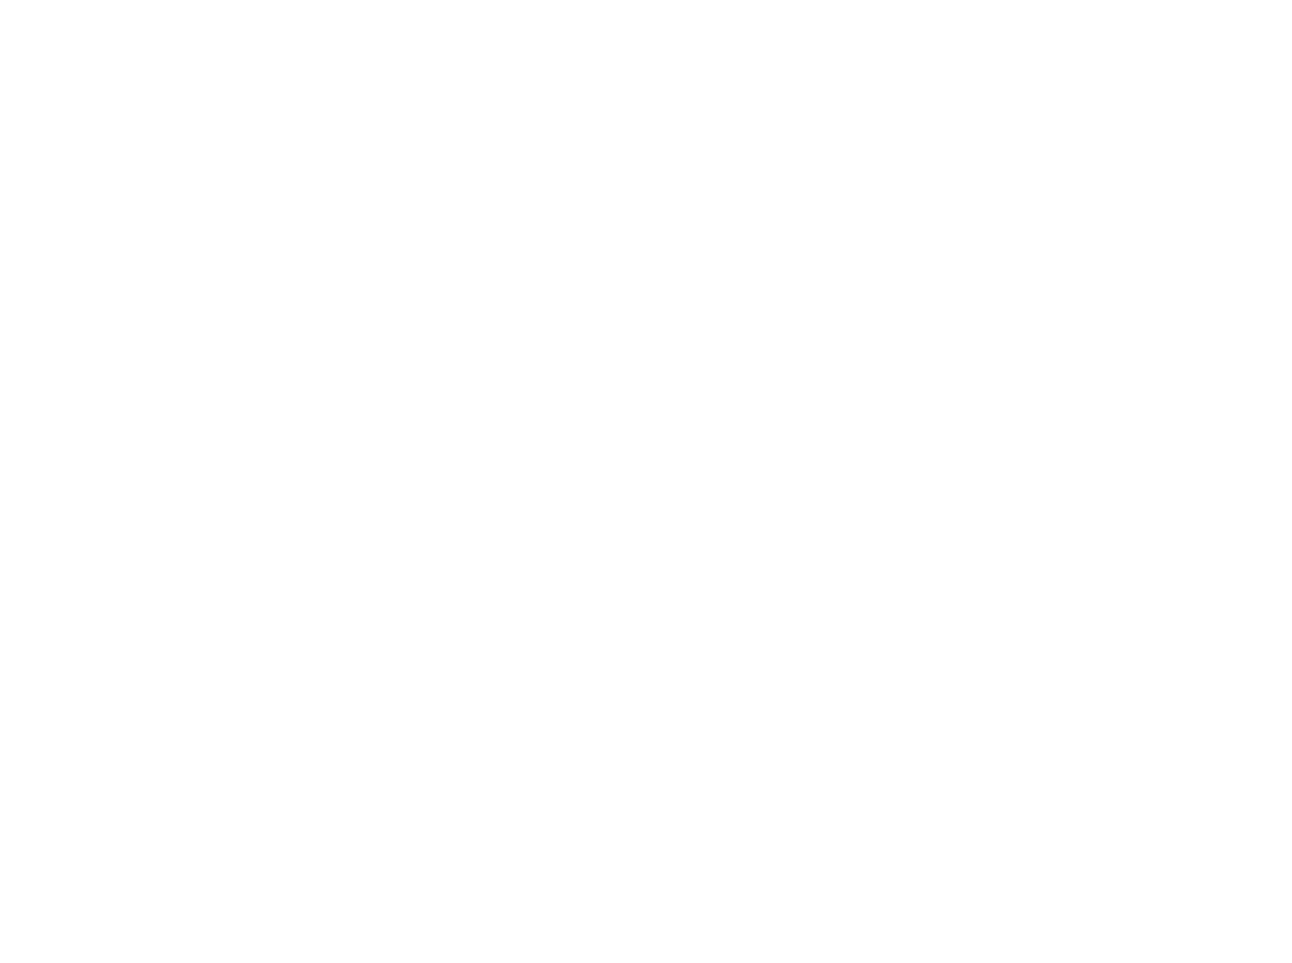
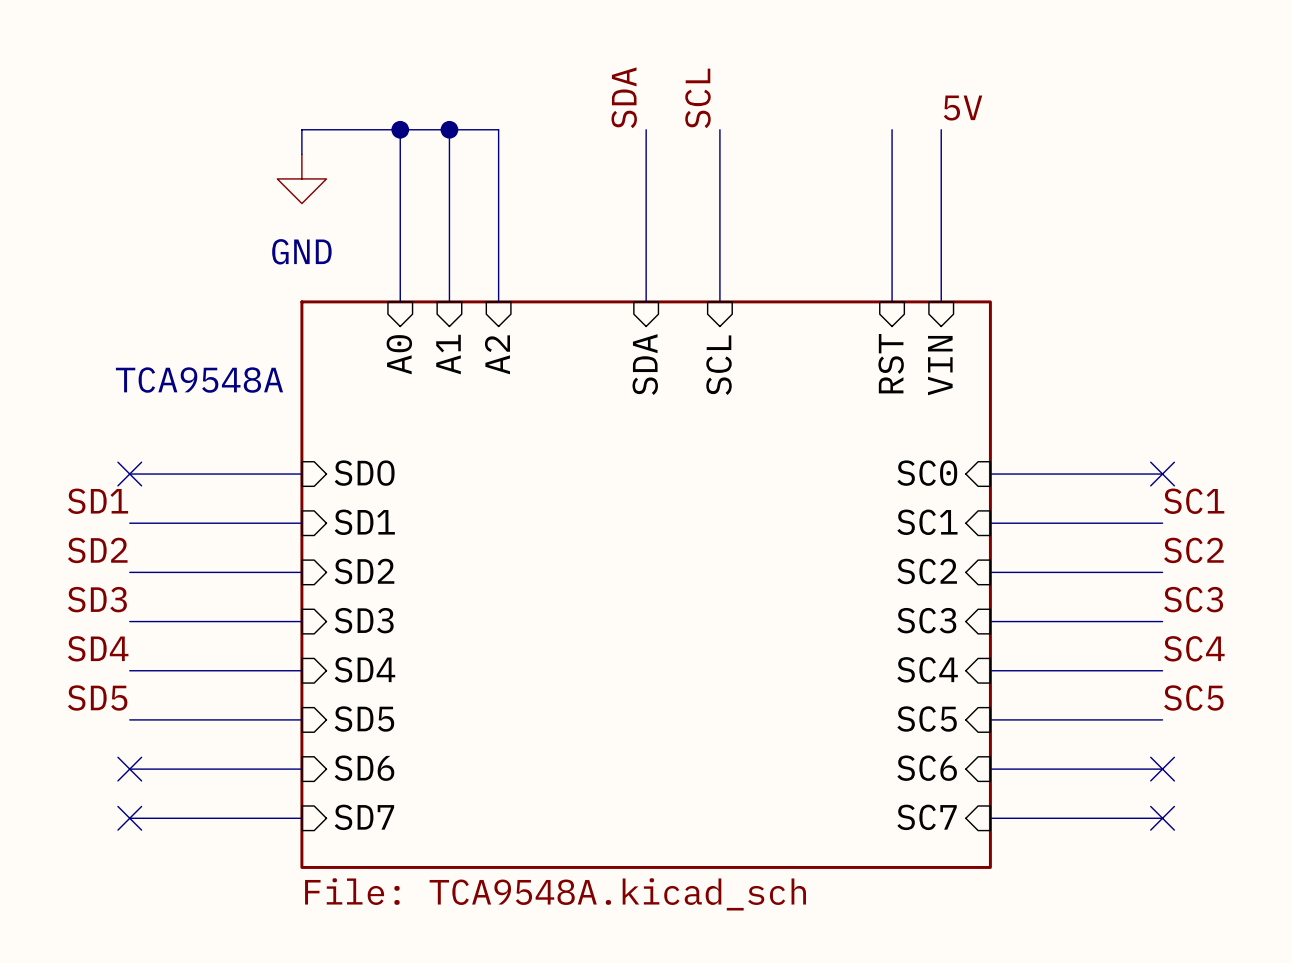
label: none -> SDA (624, 97)
label: none -> SCL (697, 98)
label: none -> 5V (963, 108)
wire: none -> (400, 129) (400, 301)
junction: none -> (400, 129)
wire: none -> (449, 129) (449, 301)
junction: none -> (449, 129)
wire: none -> (646, 129) (646, 301)
wire: none -> (719, 129) (719, 301)
wire: none -> (892, 129) (892, 301)
wire: none -> (941, 129) (941, 301)
wire: none -> (301, 154) (301, 129) (498, 129) (498, 301)
power symbol: none -> GND (301, 178)
sheet pin: none -> A0 (399, 354)
sheet pin: none -> A1 (448, 354)
sheet pin: none -> A2 (497, 354)
sheet pin: none -> SDA (645, 364)
sheet pin: none -> RST (891, 363)
sheet pin: none -> SCL (719, 365)
sheet pin: none -> VIN (940, 365)
sheet pin: none -> SDO (364, 473)
sheet pin: none -> SC0 (927, 473)
wire: none -> (129, 474) (301, 474)
no-connect mark: none -> (129, 474)
wire: none -> (990, 474) (1162, 474)
no-connect mark: none -> (1162, 474)
label: none -> SD1 (98, 501)
label: none -> SC1 (1194, 501)
sheet pin: none -> SD1 (364, 522)
sheet pin: none -> SC1 (927, 522)
wire: none -> (129, 523) (301, 523)
wire: none -> (990, 523) (1162, 523)
label: none -> SD2 (97, 550)
label: none -> SC2 (1193, 550)
sheet pin: none -> SD2 (364, 571)
sheet pin: none -> SC2 (927, 571)
wire: none -> (129, 572) (301, 572)
wire: none -> (990, 572) (1162, 572)
sheet TCA9548A: none -> File: TCA9548A.kicad_sch (646, 584)
label: none -> SD3 (97, 599)
label: none -> SC3 (1193, 599)
sheet pin: none -> SD3 (364, 620)
sheet pin: none -> SC3 (926, 620)
wire: none -> (129, 621) (301, 621)
wire: none -> (990, 621) (1162, 621)
label: none -> SD4 (98, 648)
label: none -> SC4 (1194, 648)
sheet pin: none -> SD4 (364, 669)
sheet pin: none -> SC4 (927, 669)
wire: none -> (129, 670) (301, 670)
wire: none -> (990, 670) (1162, 670)
label: none -> SD5 (97, 697)
label: none -> SC5 (1193, 697)
wire: none -> (129, 719) (301, 719)
sheet pin: none -> SD5 (364, 719)
sheet pin: none -> SC5 (927, 719)
wire: none -> (990, 719) (1162, 719)
sheet pin: none -> SD6 (364, 768)
sheet pin: none -> SC6 (927, 768)
wire: none -> (129, 769) (301, 769)
no-connect mark: none -> (129, 769)
wire: none -> (990, 769) (1162, 769)
no-connect mark: none -> (1162, 769)
sheet pin: none -> SD7 (364, 817)
sheet pin: none -> SC7 (927, 817)
wire: none -> (129, 818) (301, 818)
no-connect mark: none -> (129, 818)
wire: none -> (990, 818) (1162, 818)
no-connect mark: none -> (1162, 818)

